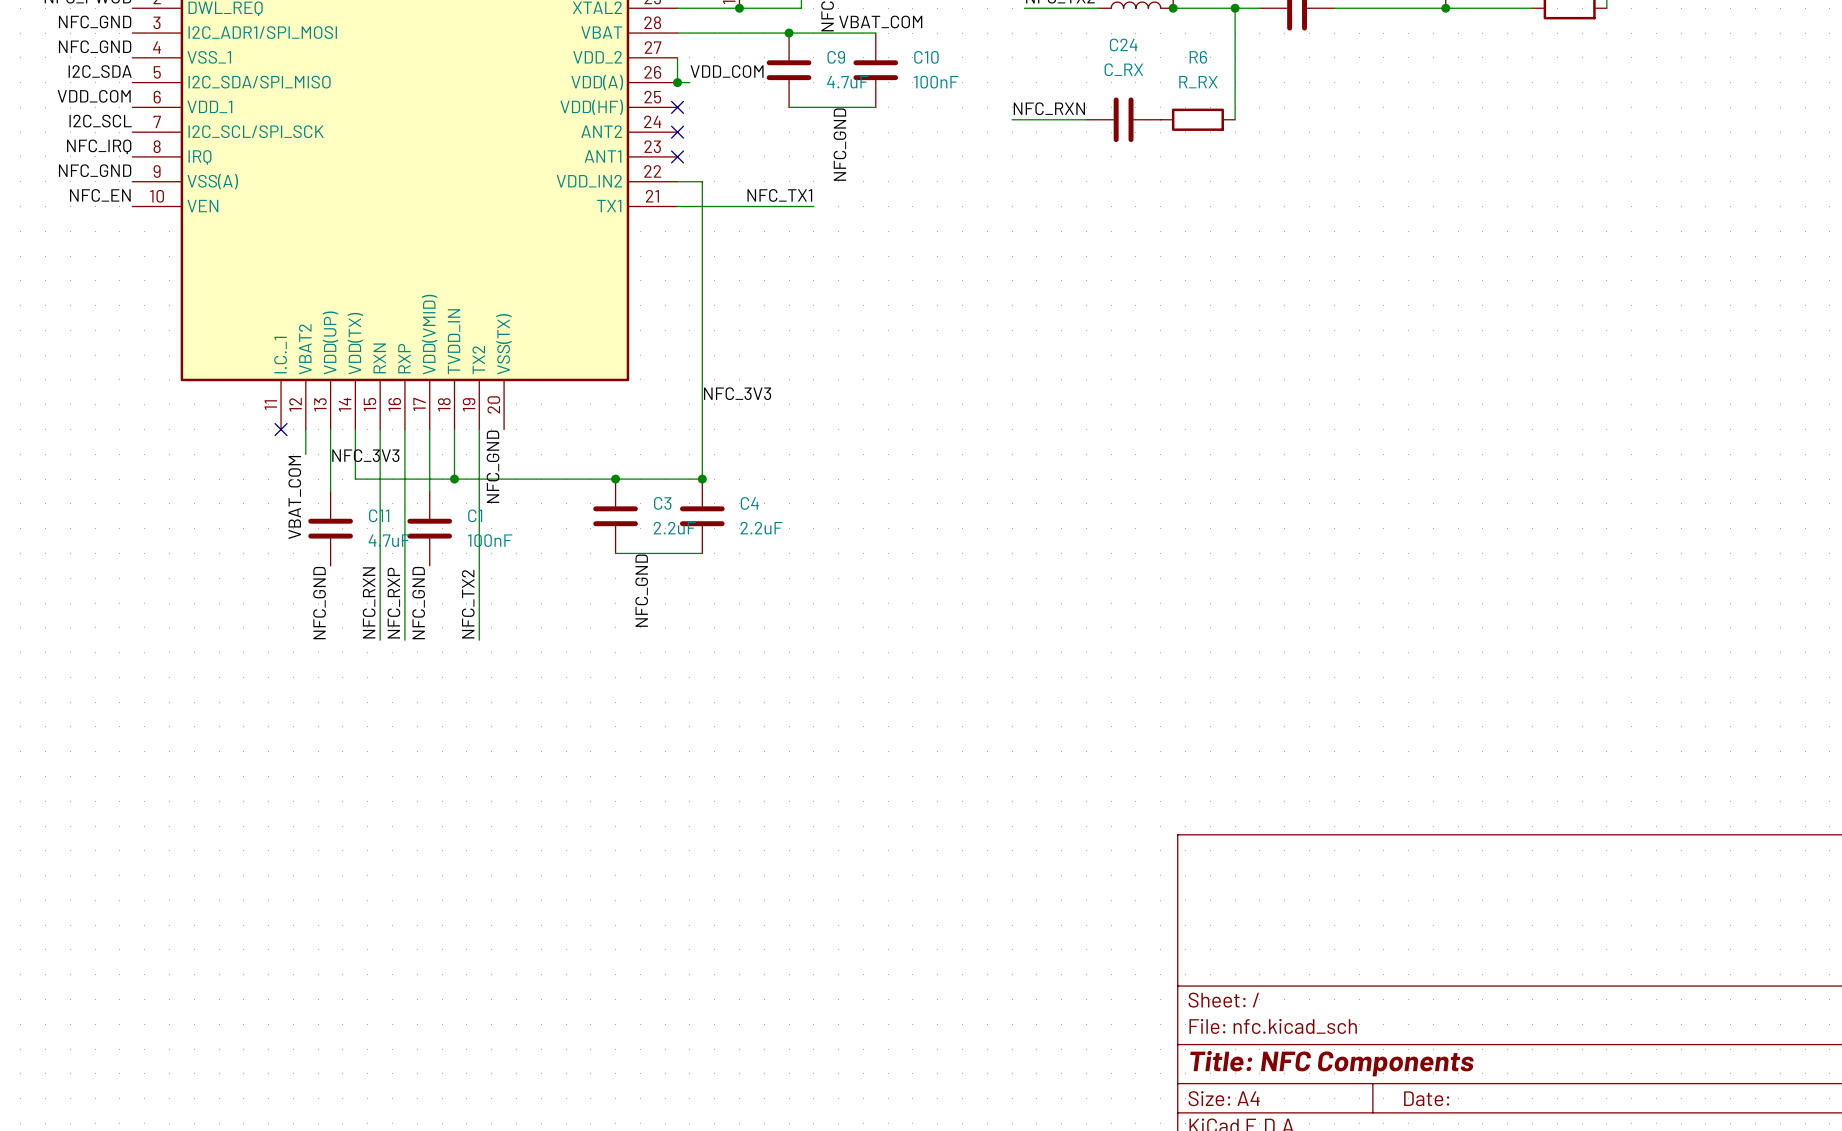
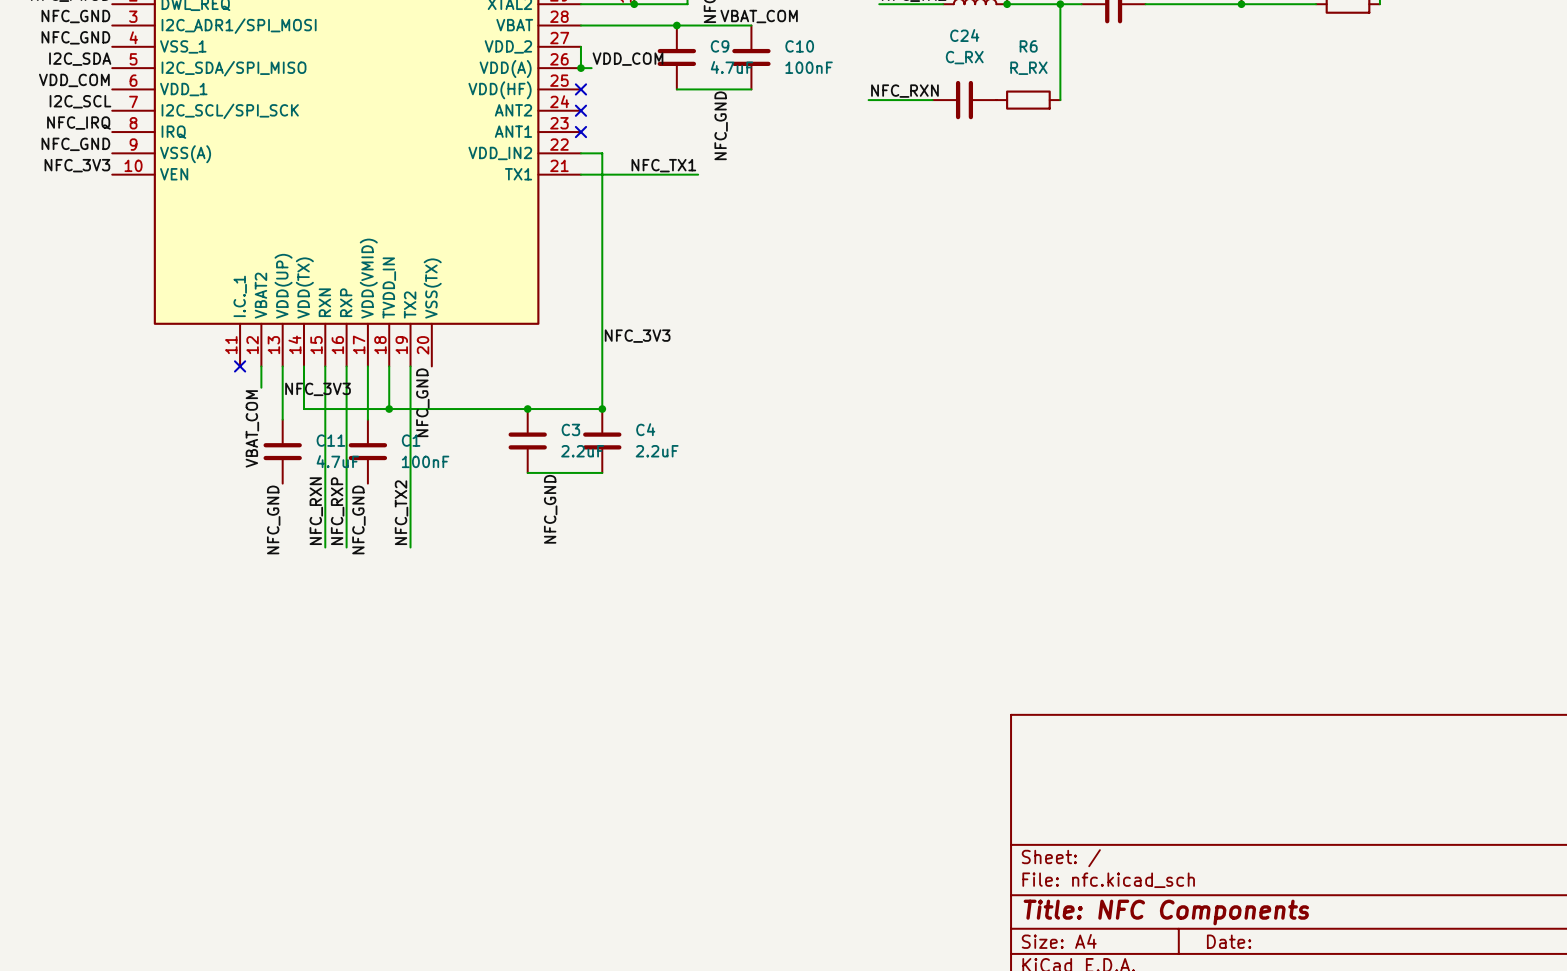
label: NFC_EN (100, 195) -> NFC_3V3 (77, 165)

